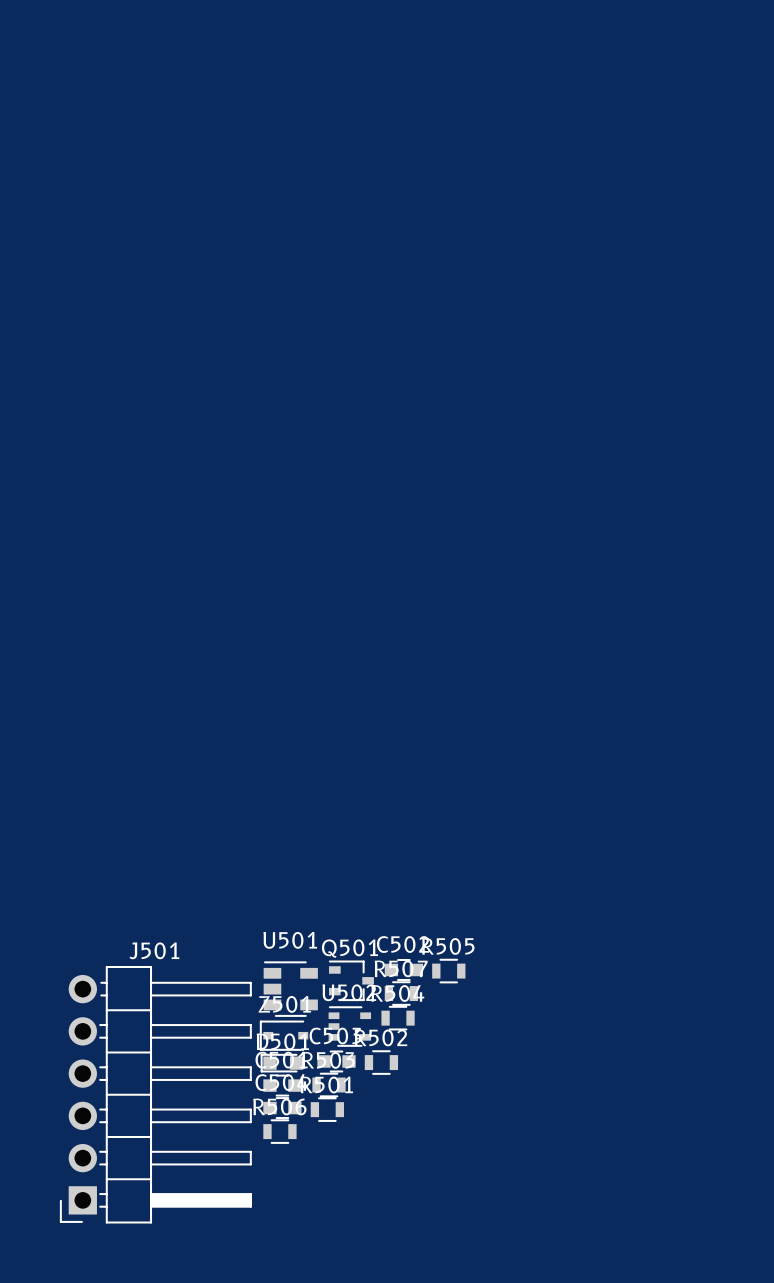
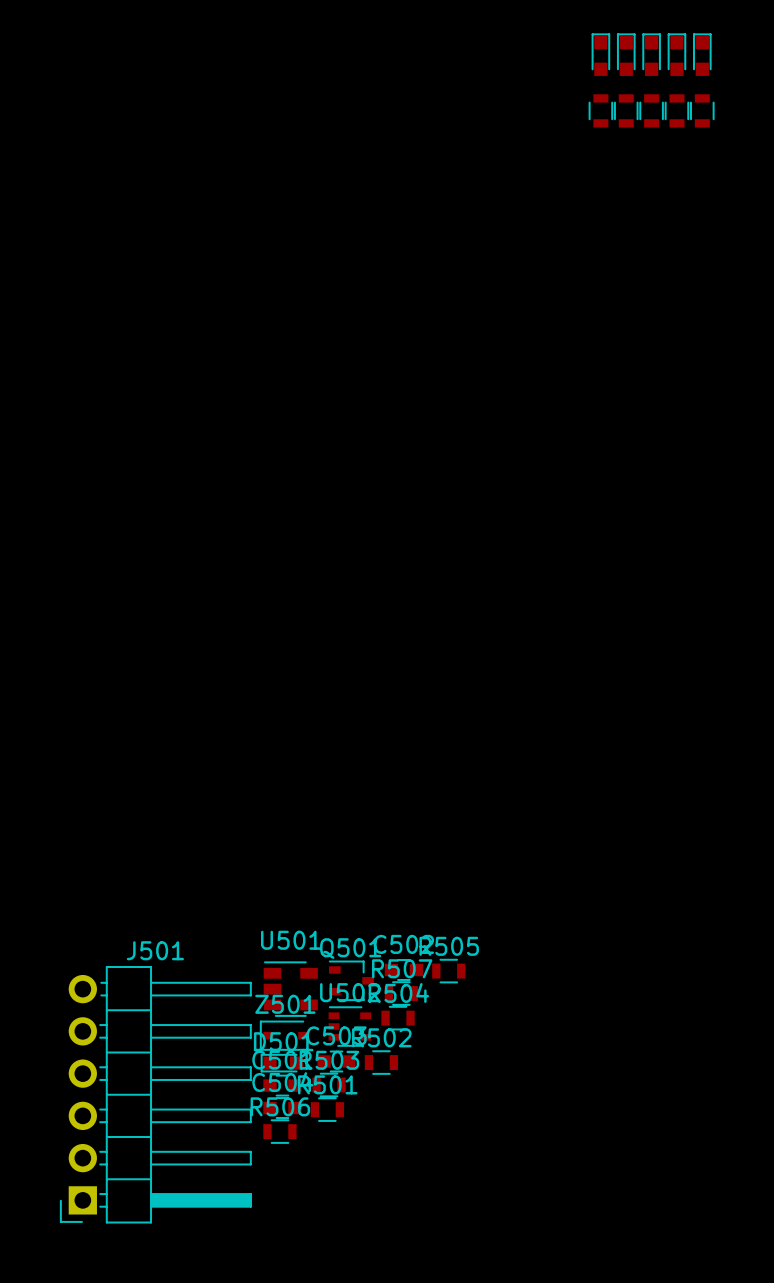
part: none -> (600, 54)
part: none -> (626, 54)
part: none -> (651, 54)
part: none -> (676, 54)
part: none -> (702, 54)
part: none -> (600, 110)
part: none -> (626, 110)
part: none -> (651, 110)
part: none -> (676, 110)
part: none -> (702, 110)

